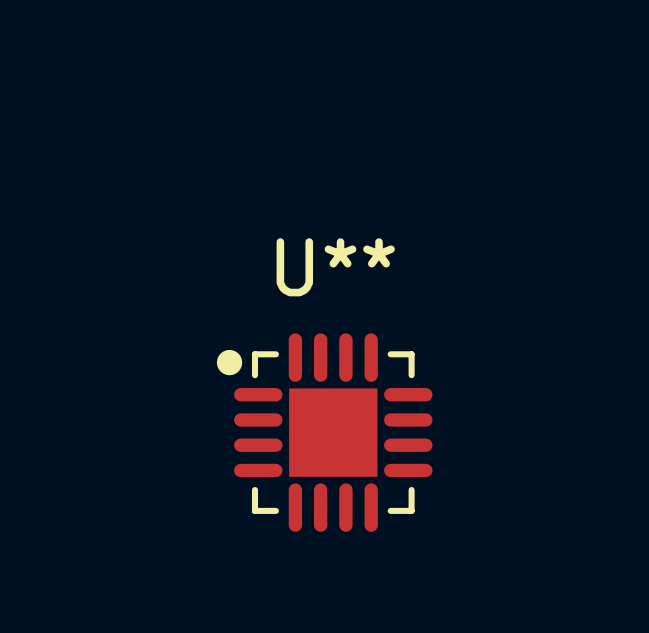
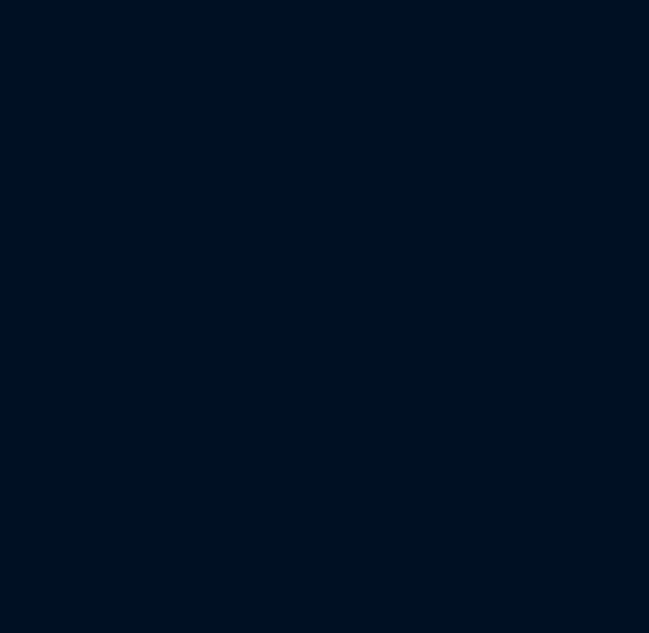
U**: (324, 432) -> none

